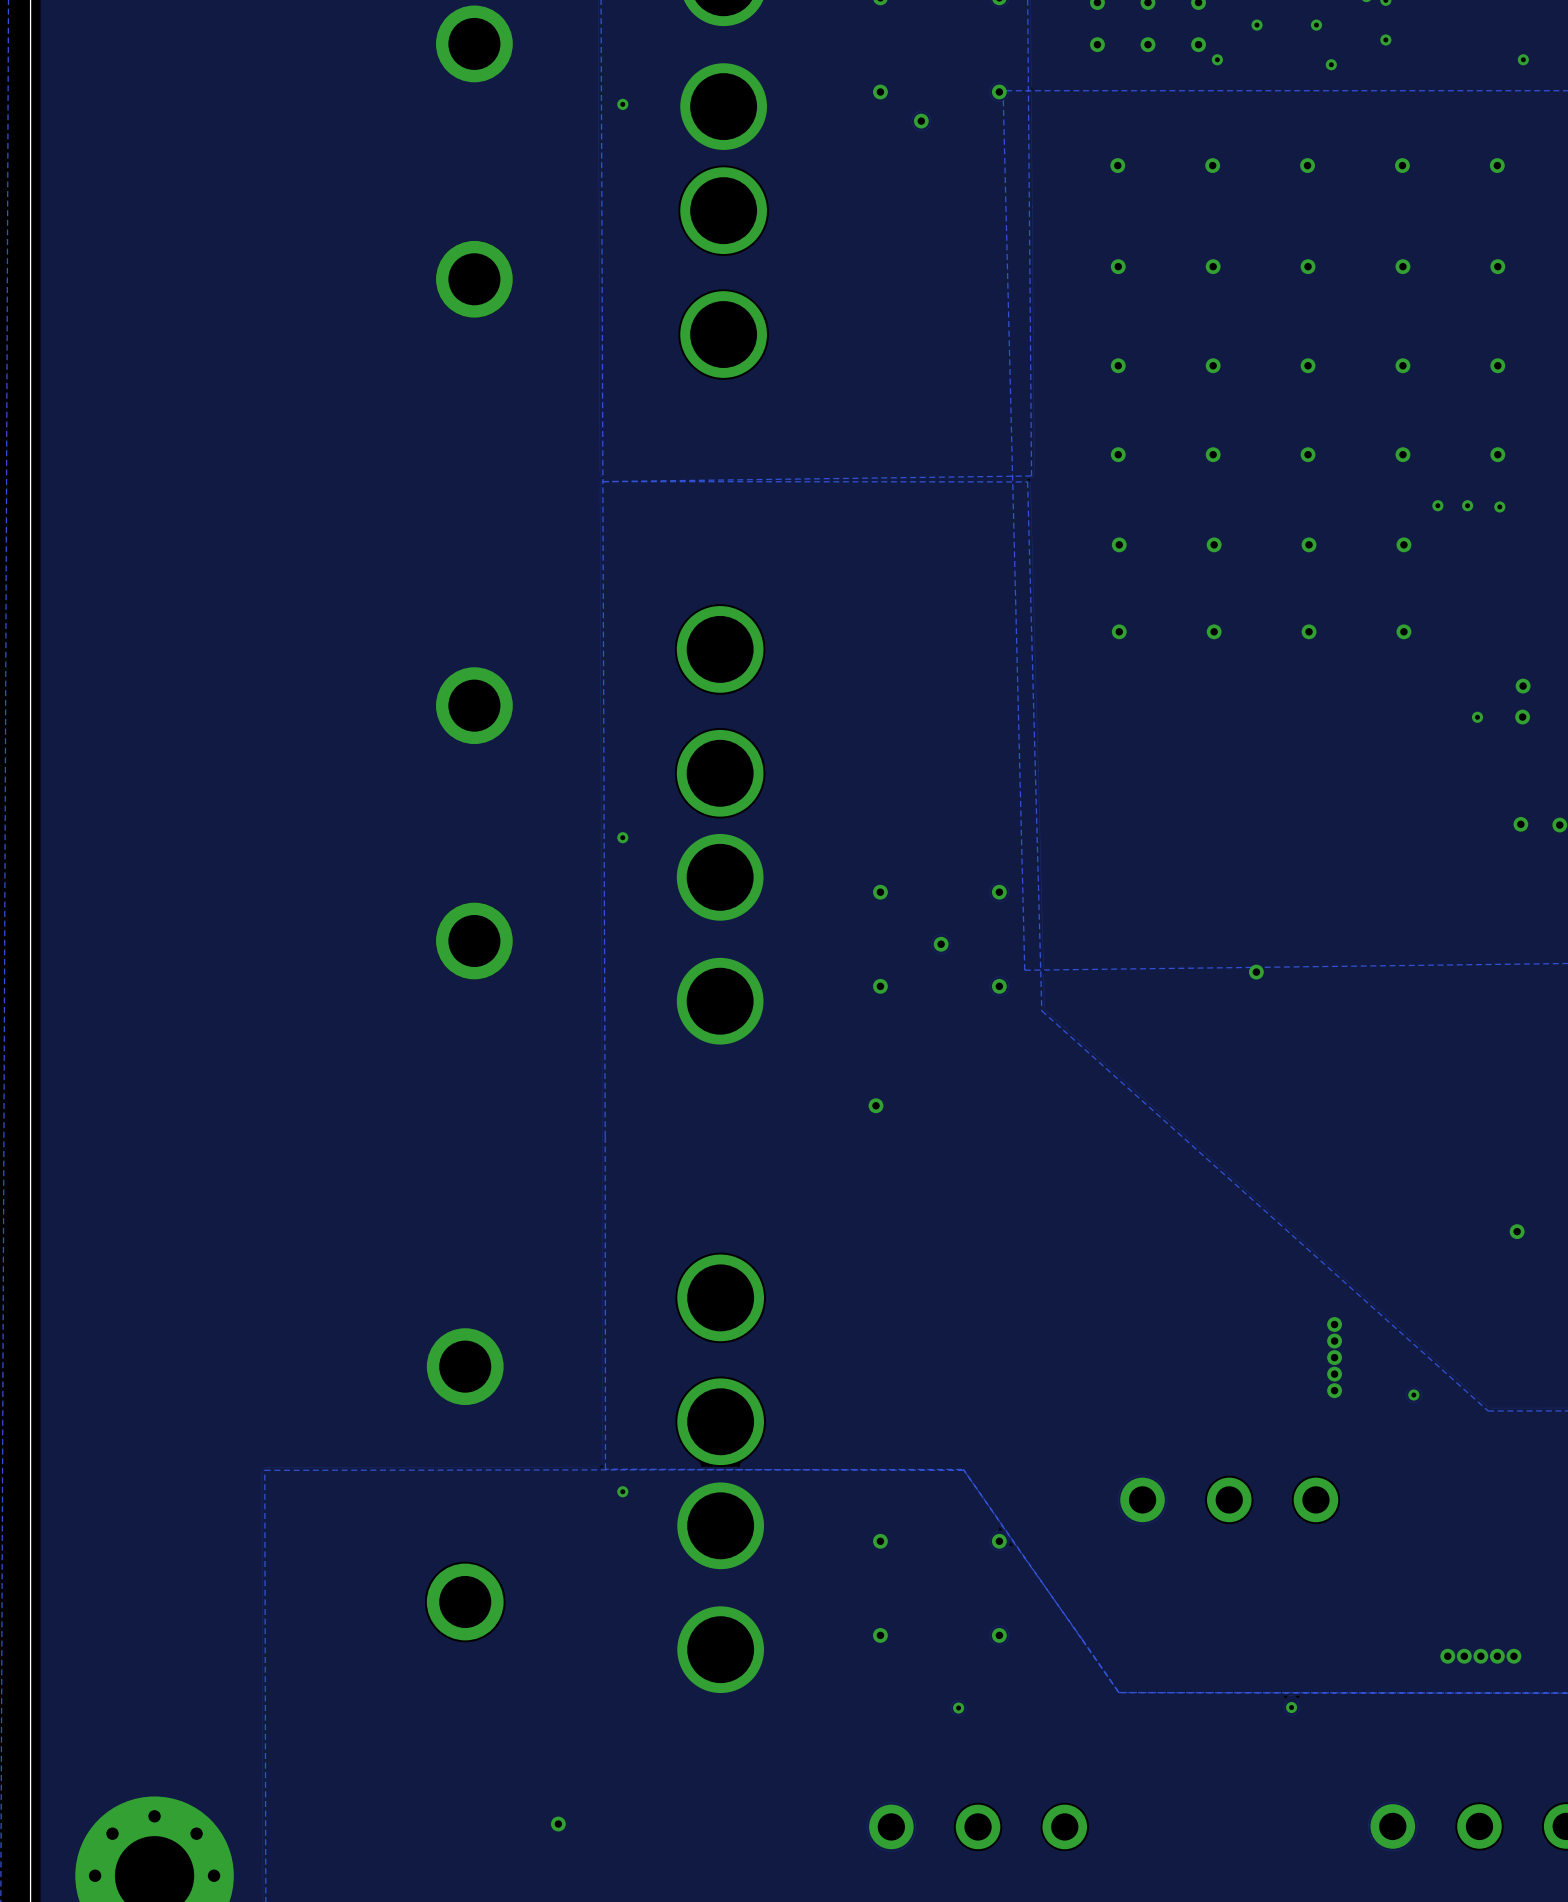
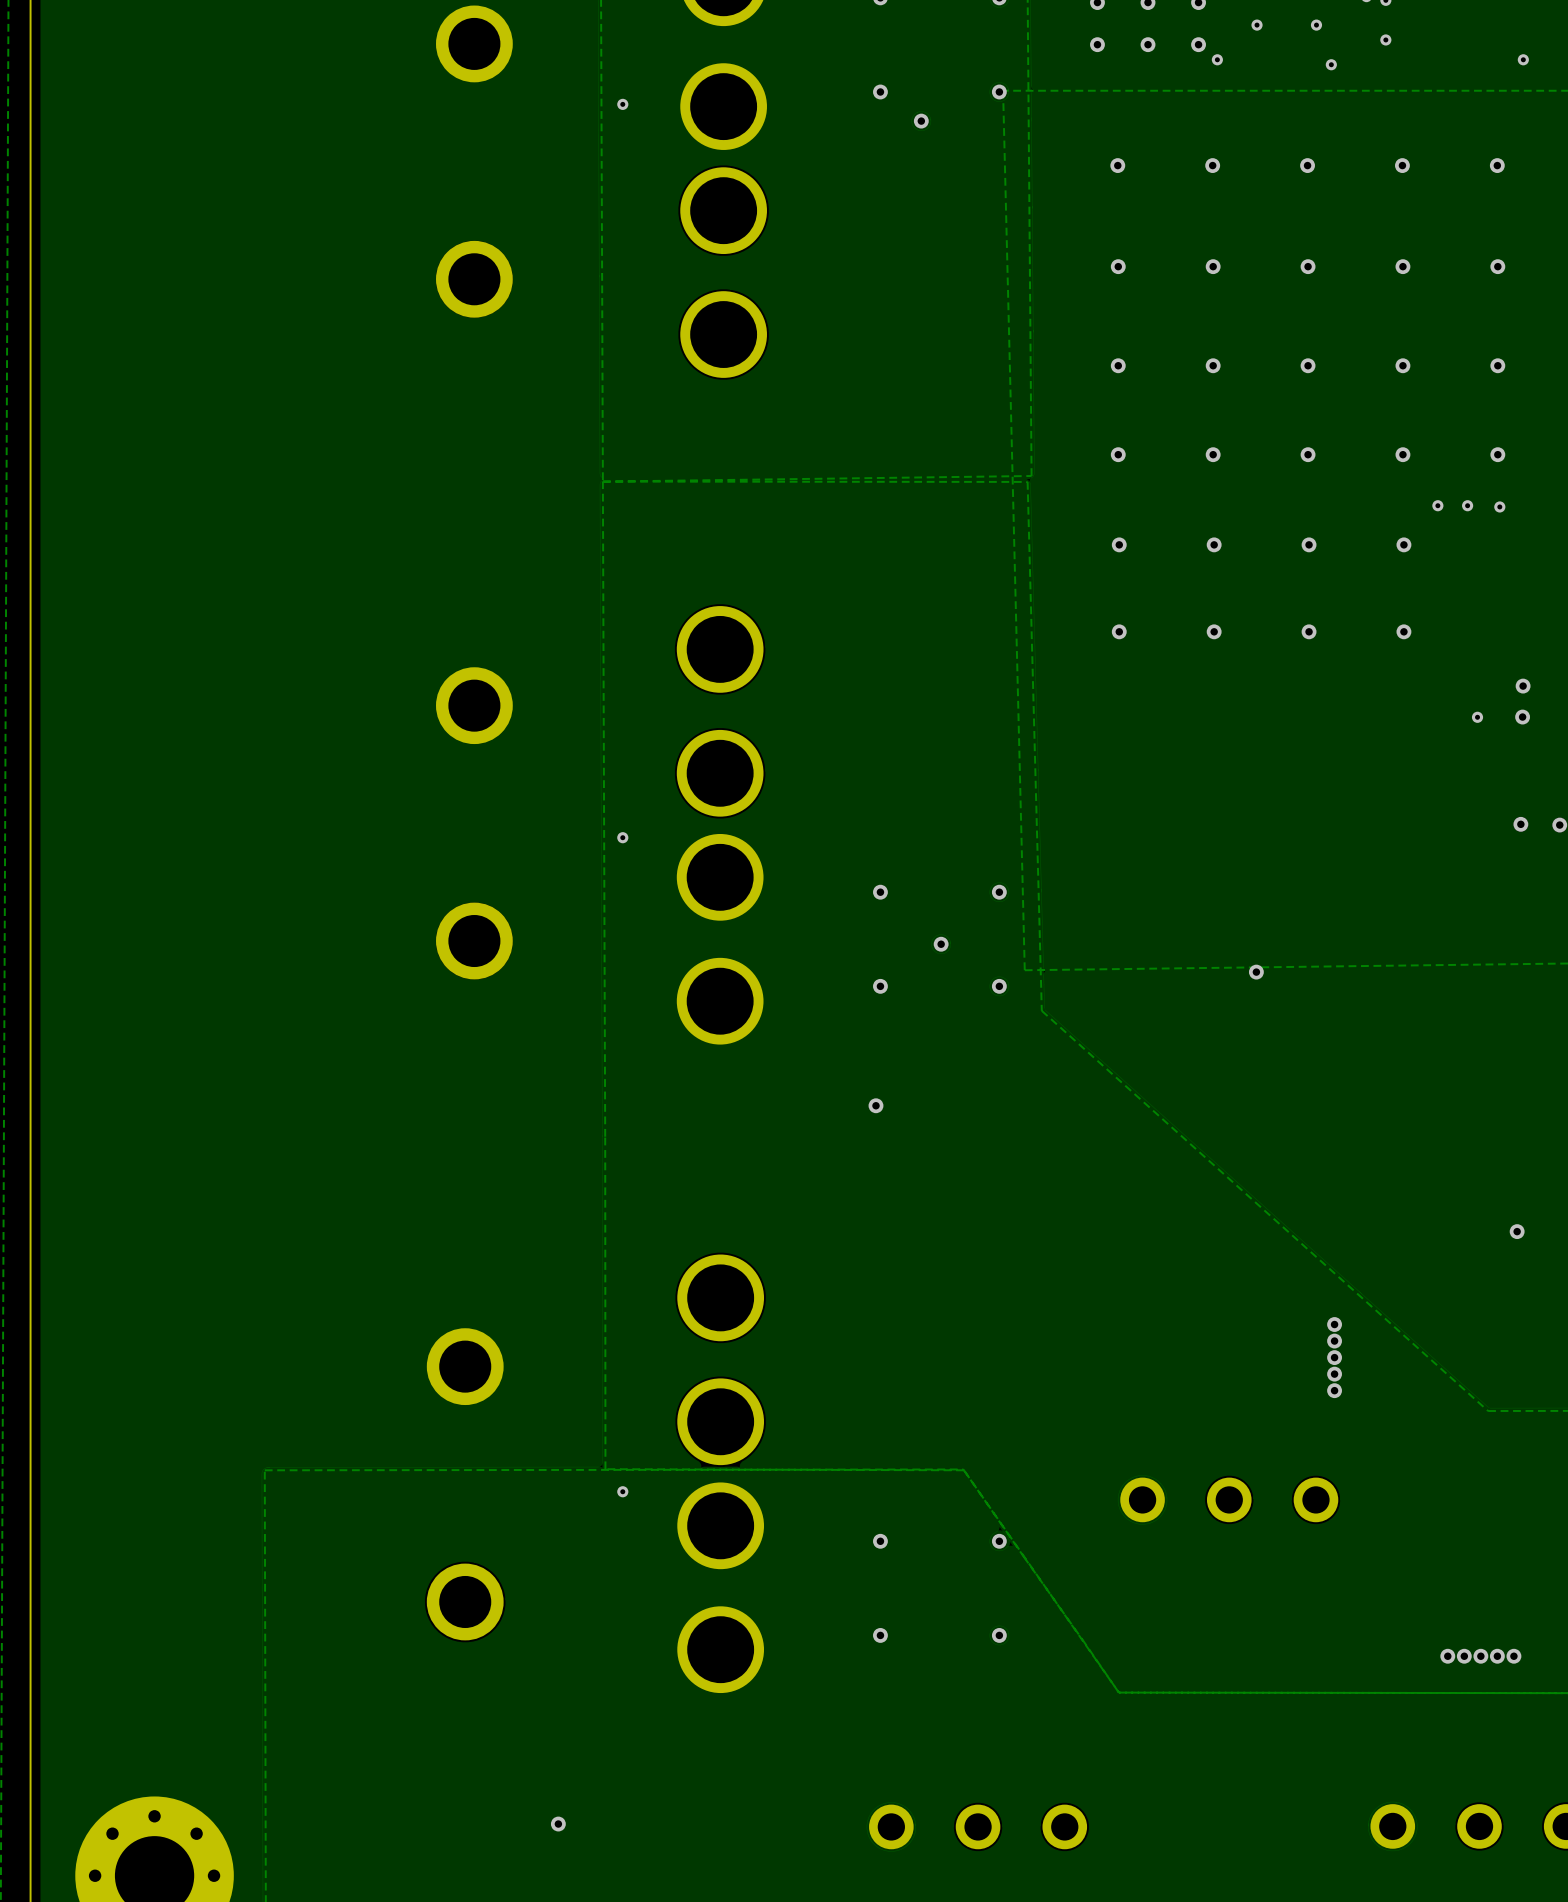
via: (1413, 1395) -> none
via: (1291, 1707) -> none
via: (958, 1708) -> none

